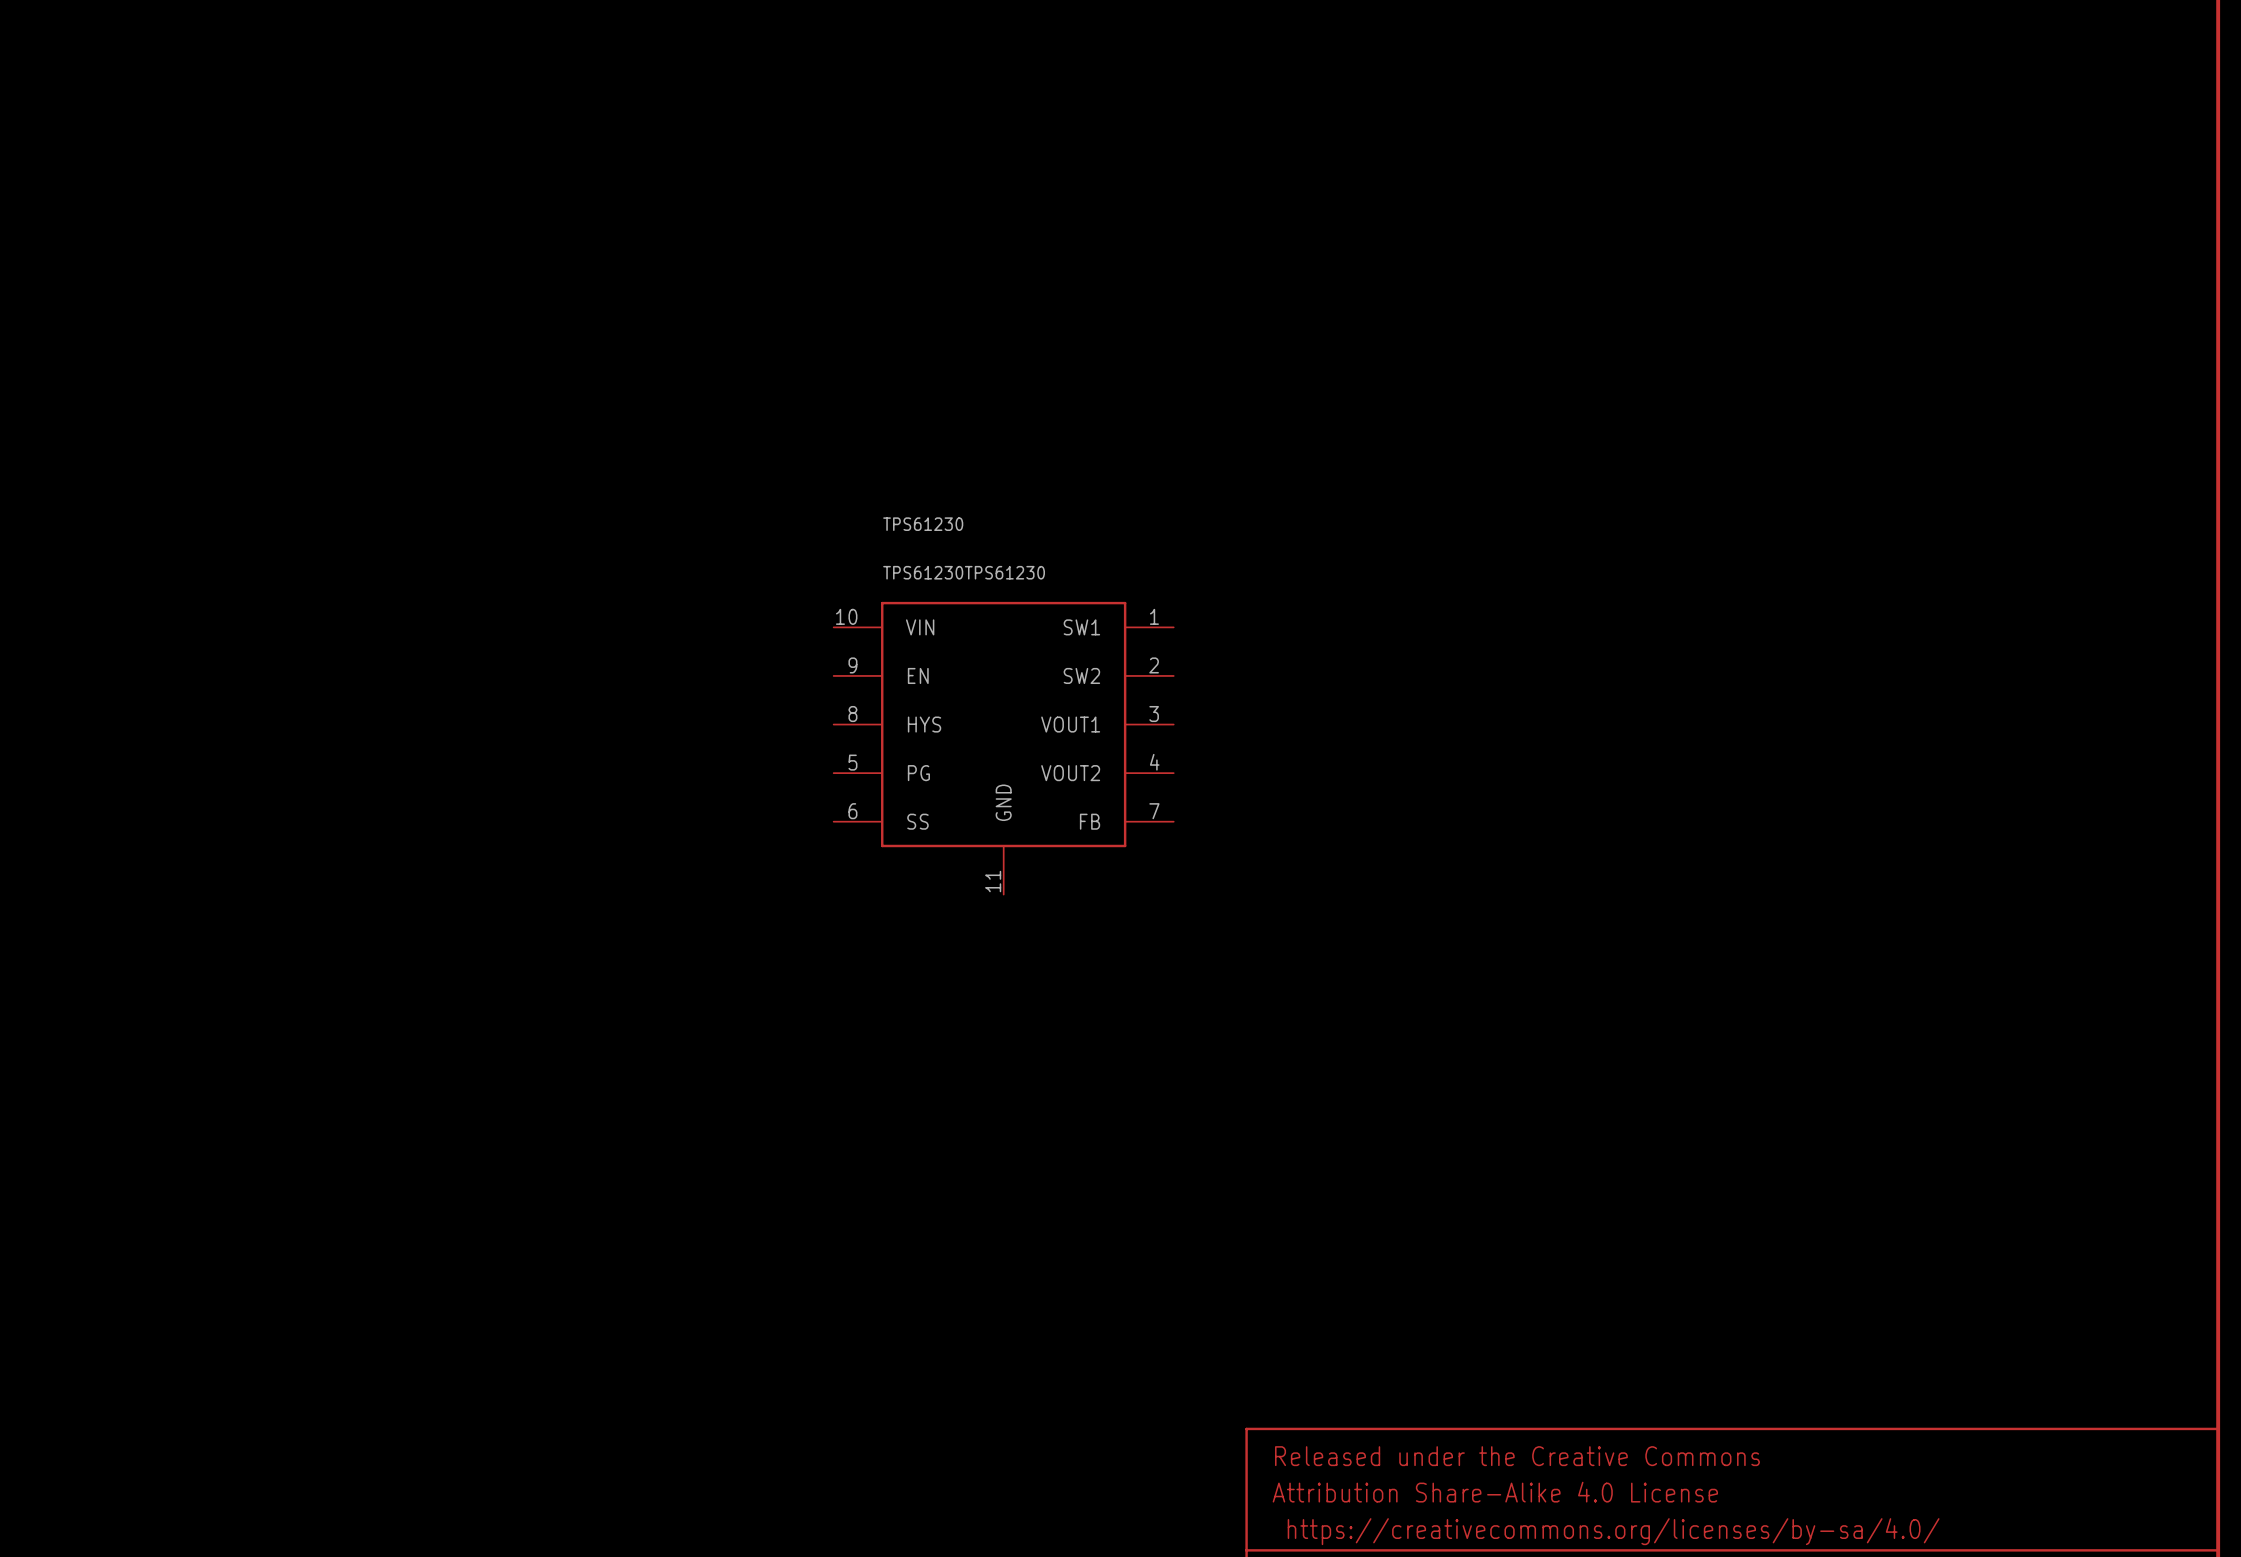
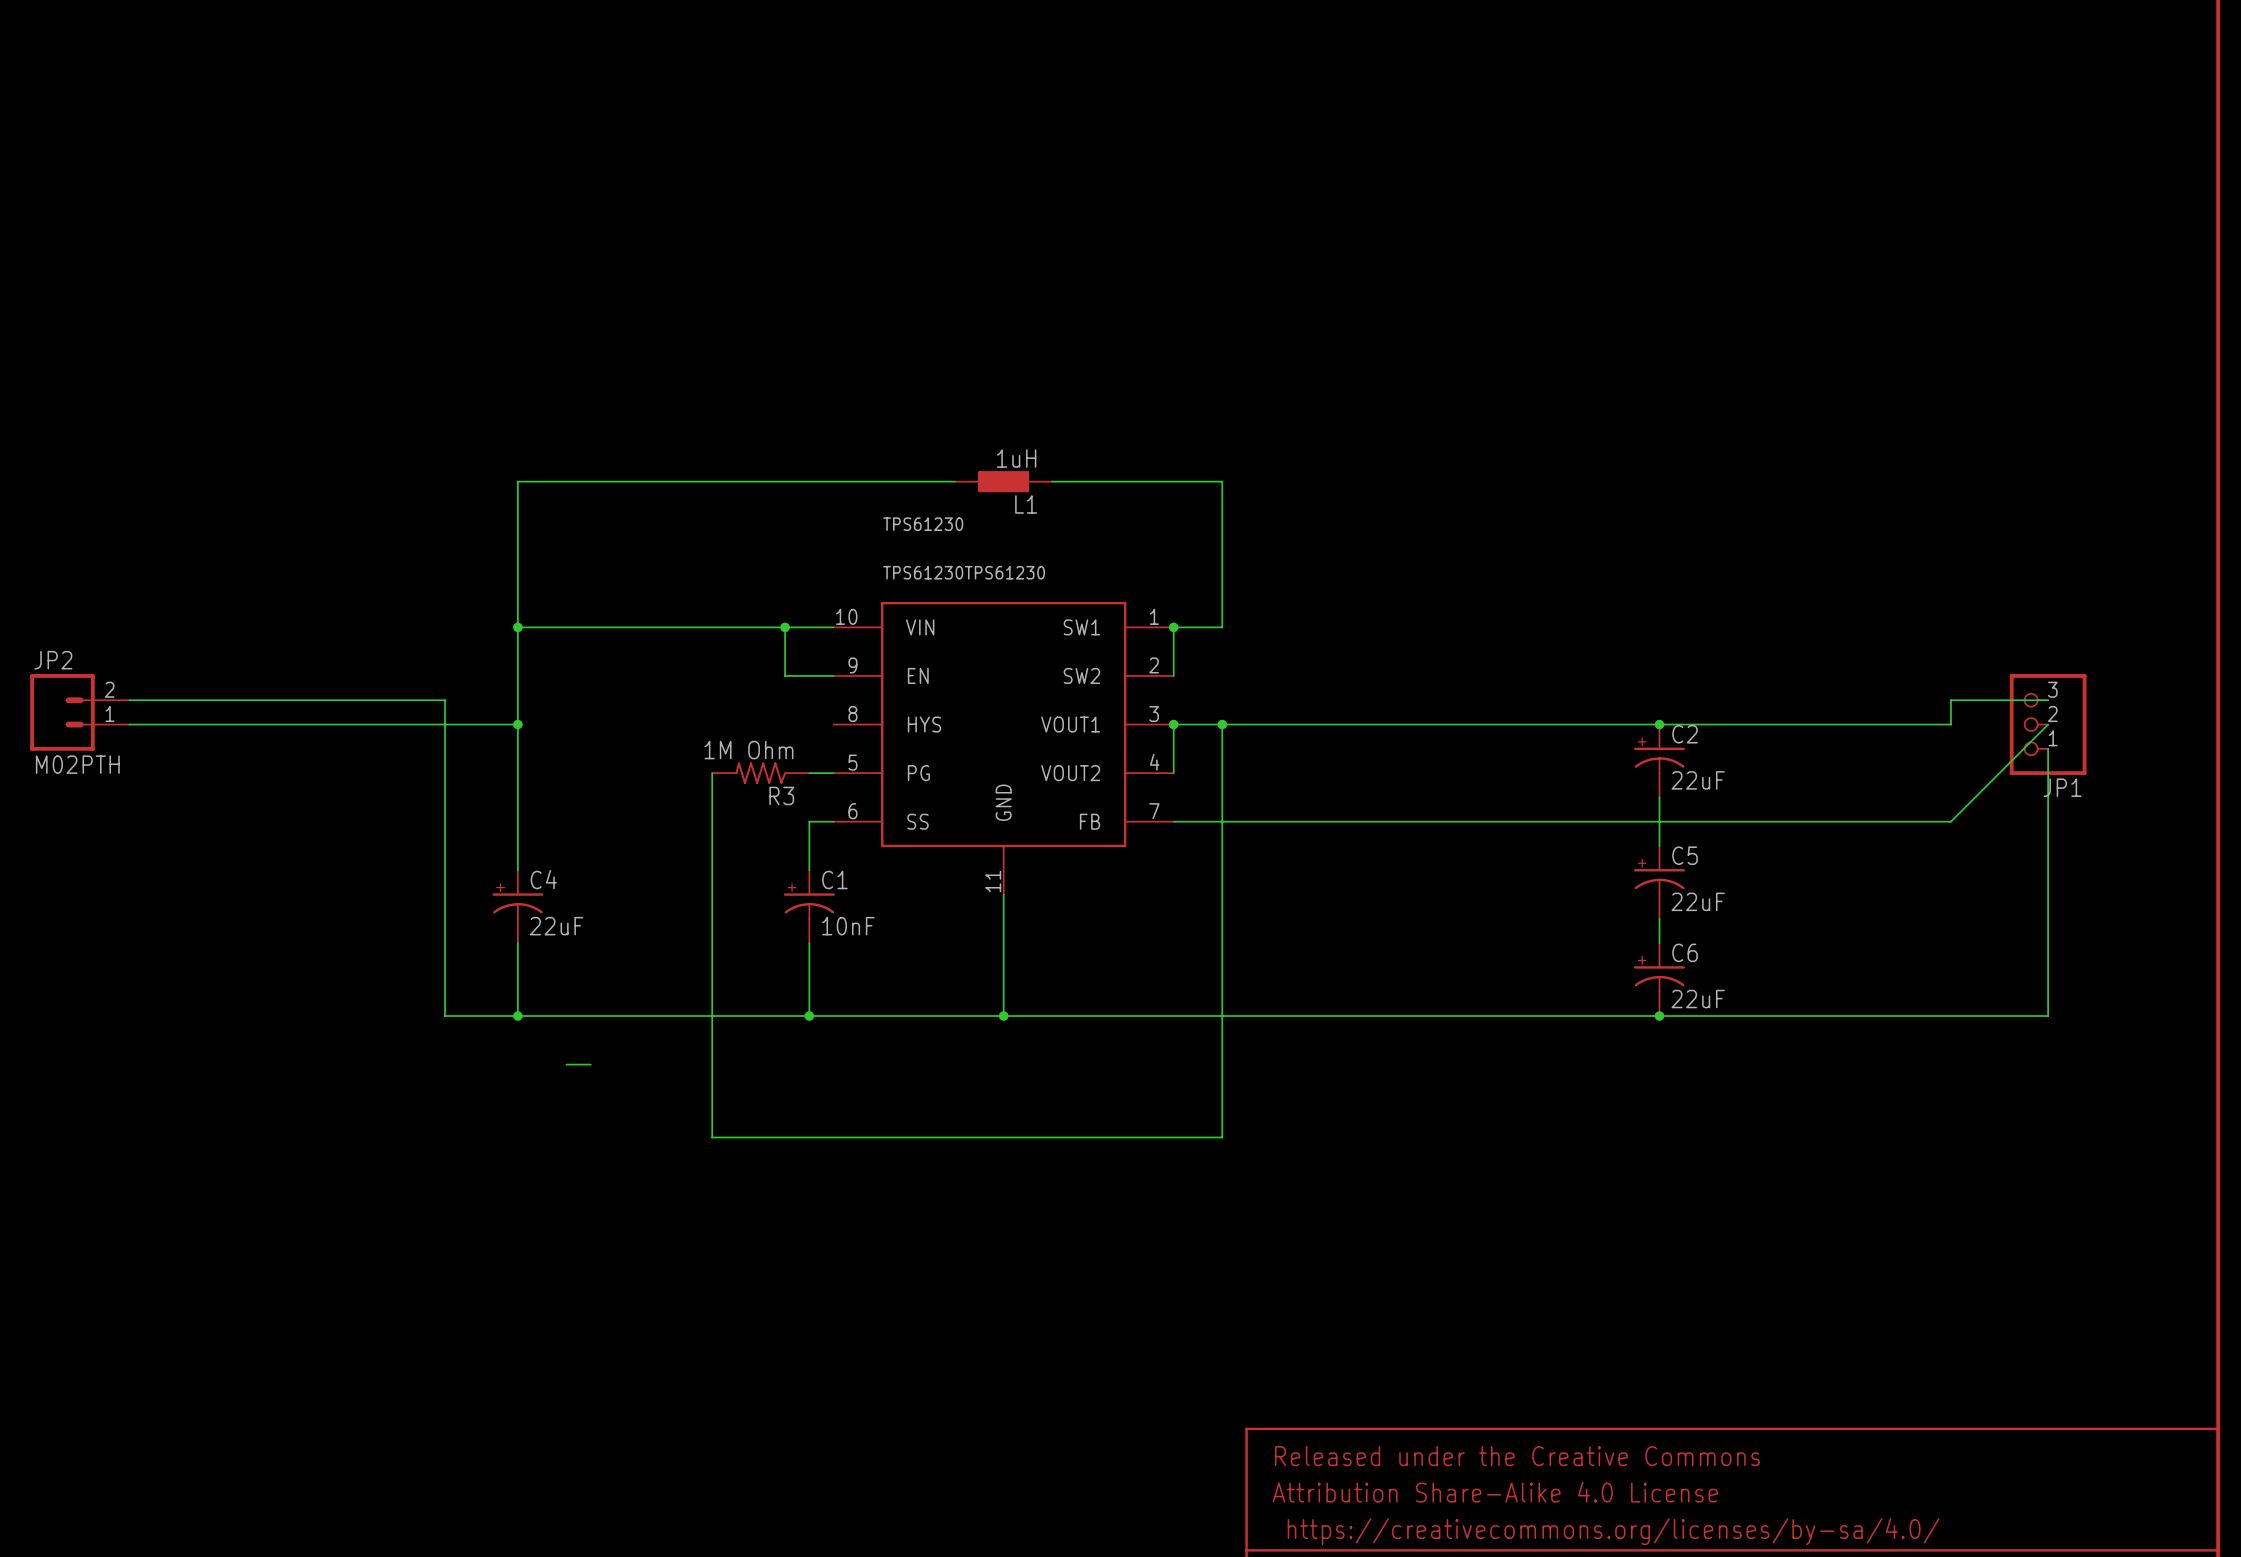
wire: none -> (955, 481) (517, 481) (517, 870)
L1: none -> 1uH (1003, 481)
wire: none -> (1052, 481) (1222, 481) (1222, 627) (1173, 627) (1173, 675)
wire: none -> (517, 627) (833, 627)
junction: none -> (517, 627)
wire: none -> (785, 627) (785, 675) (833, 675)
junction: none -> (785, 627)
junction: none -> (1173, 627)
wire: none -> (129, 700) (445, 700) (445, 1016) (2048, 1016) (2048, 748)
wire: none -> (2048, 700) (1950, 700) (1950, 724) (1173, 724) (1173, 773)
JP2: none -> M02PTH (79, 712)
wire: none -> (129, 724) (517, 724)
junction: none -> (517, 724)
junction: none -> (1173, 724)
wire: none -> (1222, 724) (1222, 1137) (712, 1137) (712, 773)
junction: none -> (1222, 724)
junction: none -> (1659, 724)
wire: none -> (2048, 724) (1950, 821) (1173, 821)
JP1: none -> (2048, 724)
C2: none -> 22uF (1659, 760)
R3: none -> 1M Ohm (760, 773)
wire: none -> (809, 773) (833, 773)
wire: none -> (1659, 797) (1659, 845)
wire: none -> (833, 821) (809, 821) (809, 870)
C5: none -> 22uF (1659, 882)
wire: none -> (1003, 894) (1003, 1016)
C4: none -> 22uF (517, 906)
C1: none -> 10nF (809, 906)
wire: none -> (1659, 918) (1659, 943)
wire: none -> (517, 943) (517, 1016)
wire: none -> (809, 943) (809, 1016)
C6: none -> 22uF (1659, 979)
junction: none -> (517, 1016)
junction: none -> (809, 1016)
junction: none -> (1003, 1016)
junction: none -> (1659, 1016)
wire: none -> (566, 1064) (590, 1064)

